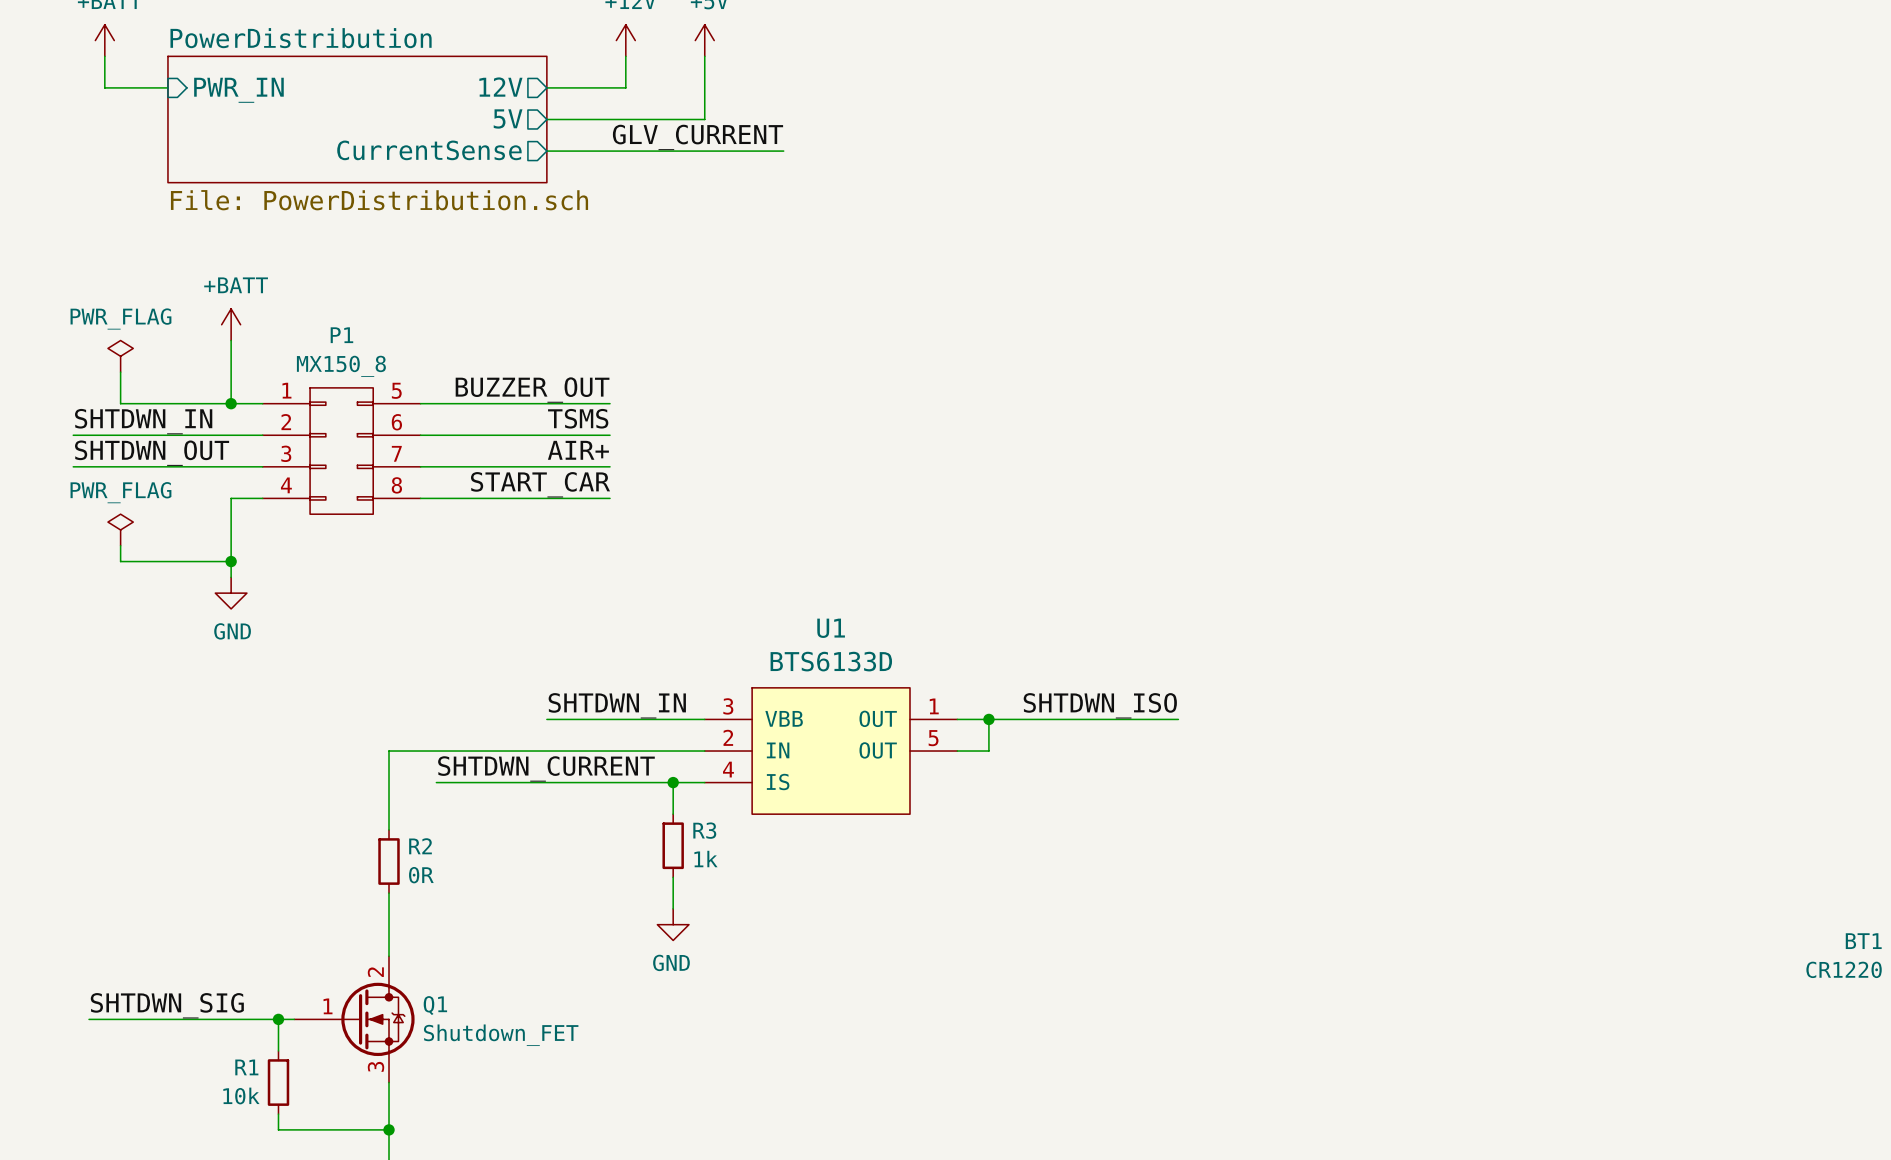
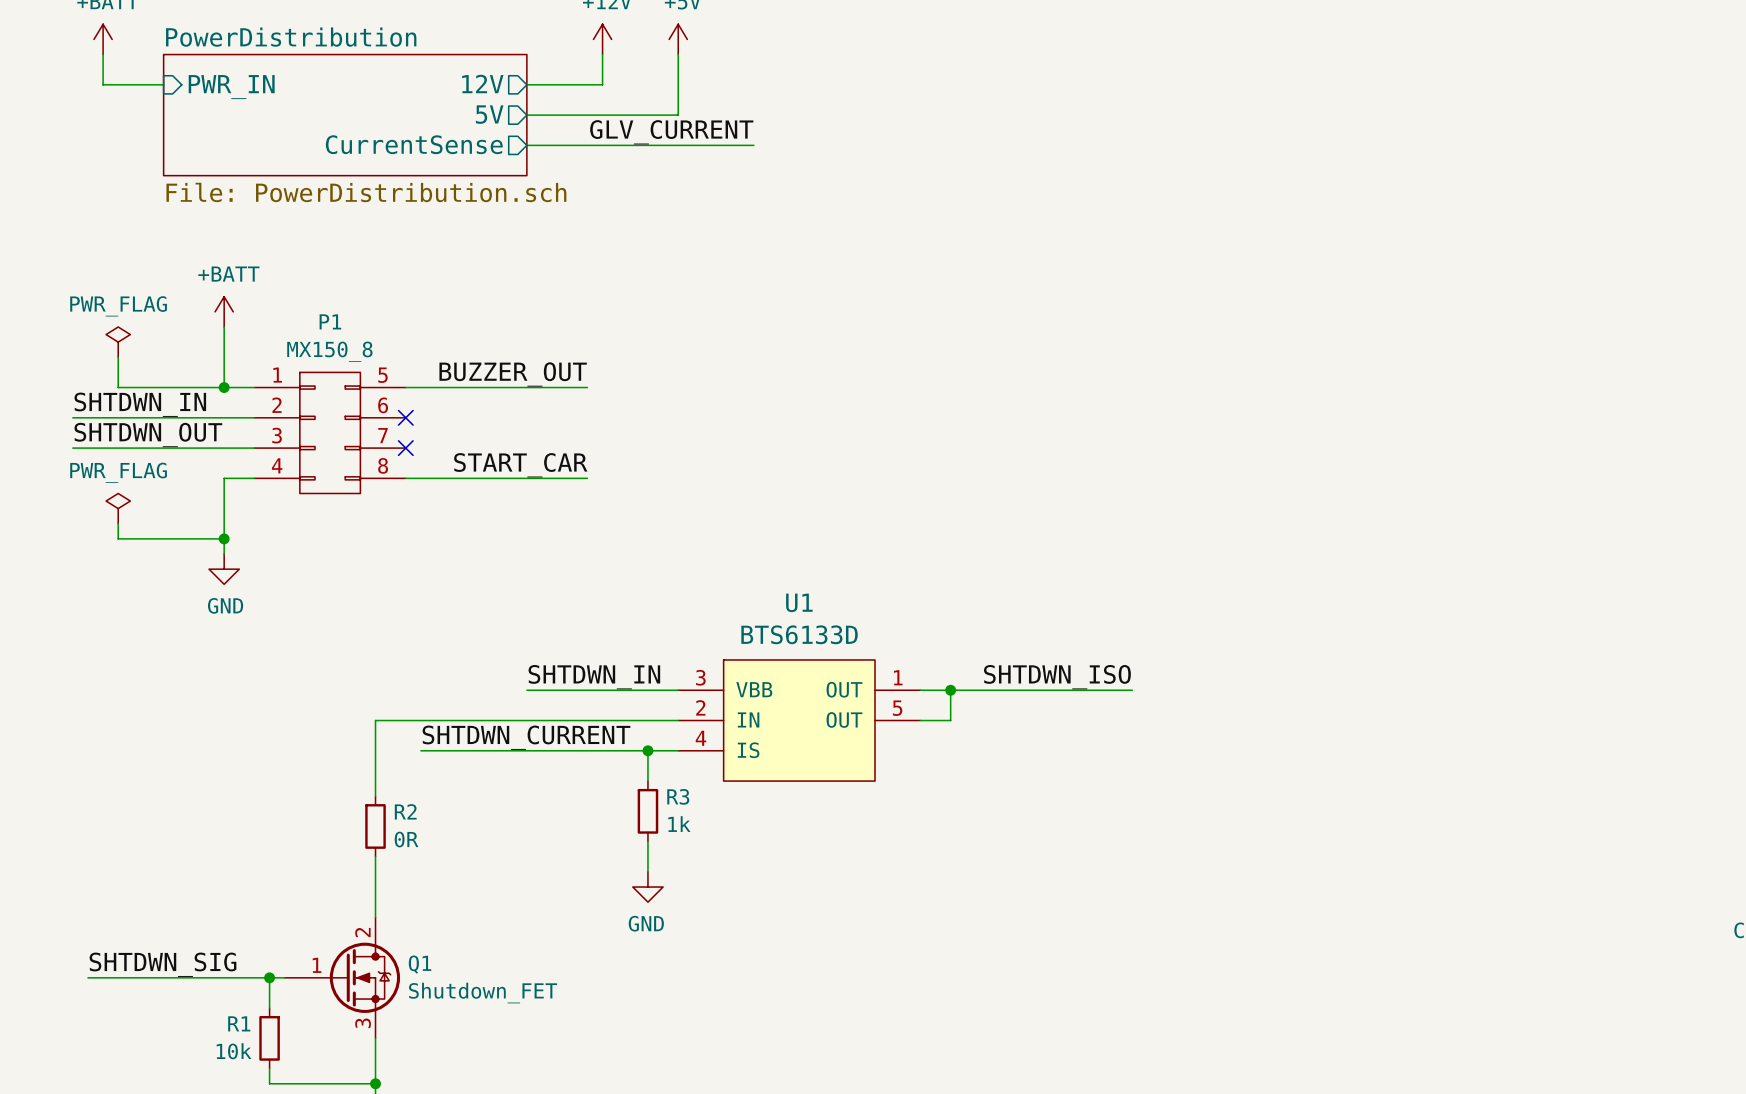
label: TSMS (578, 418) -> none
wire: (420, 435) (610, 435) -> none
no-connect mark: none -> (405, 417)
label: AIR+ (578, 450) -> none
wire: (420, 466) (610, 466) -> none
no-connect mark: none -> (405, 448)

